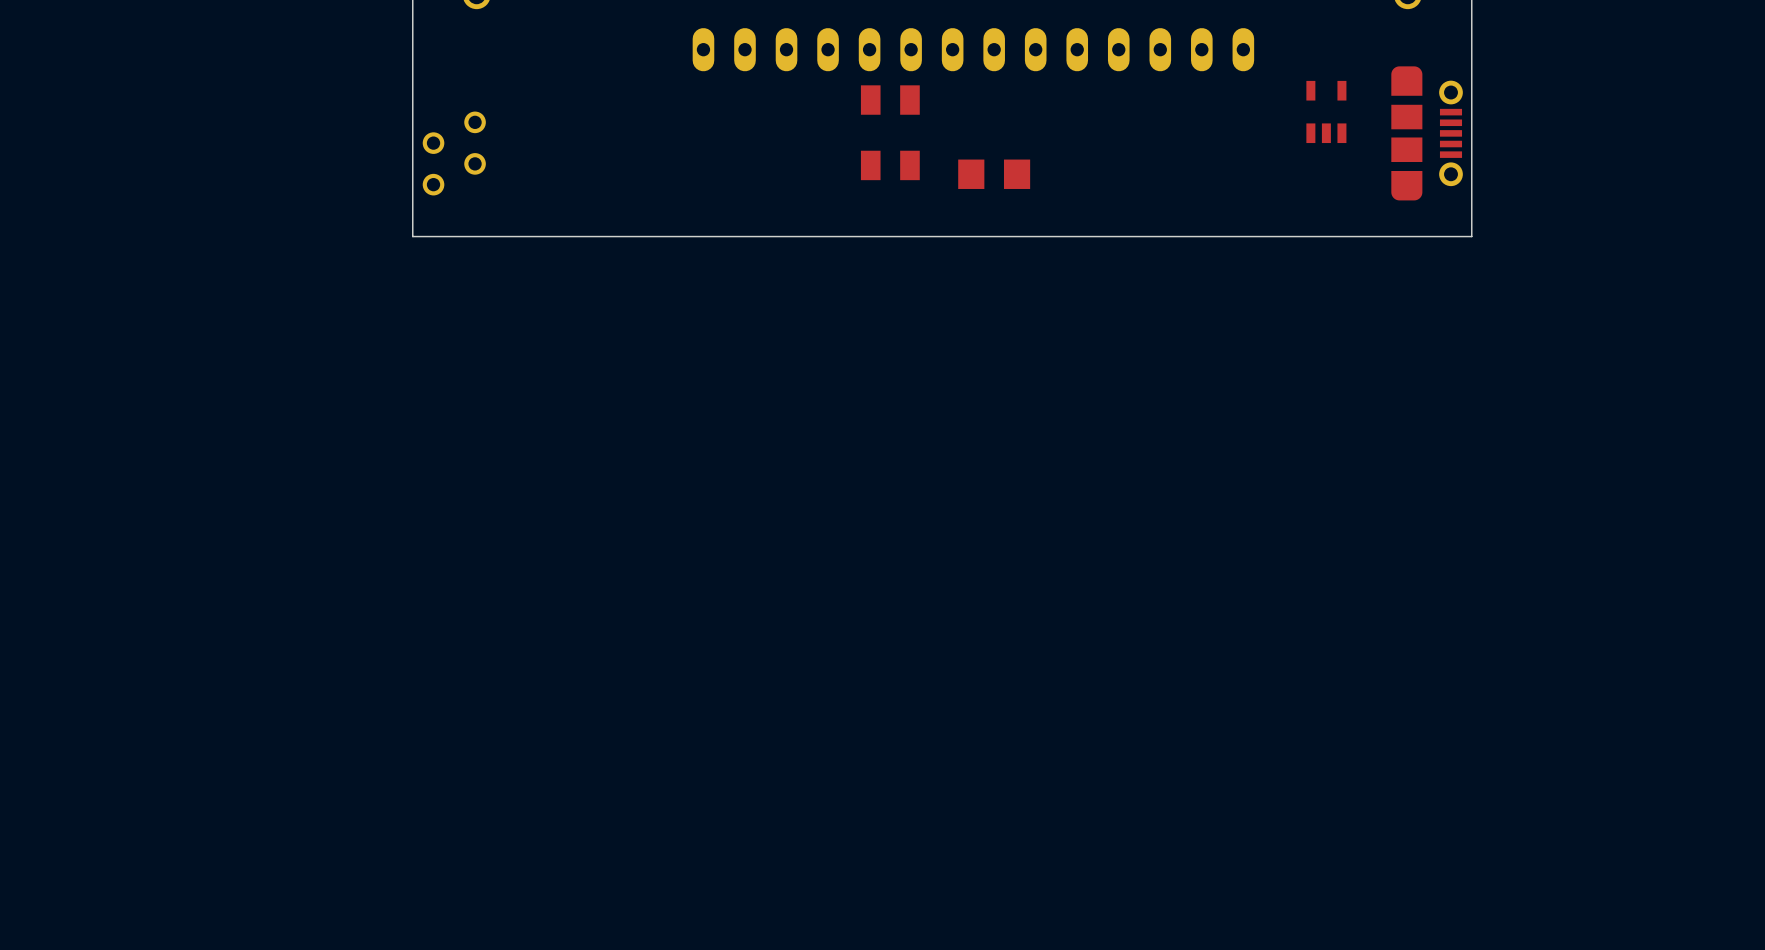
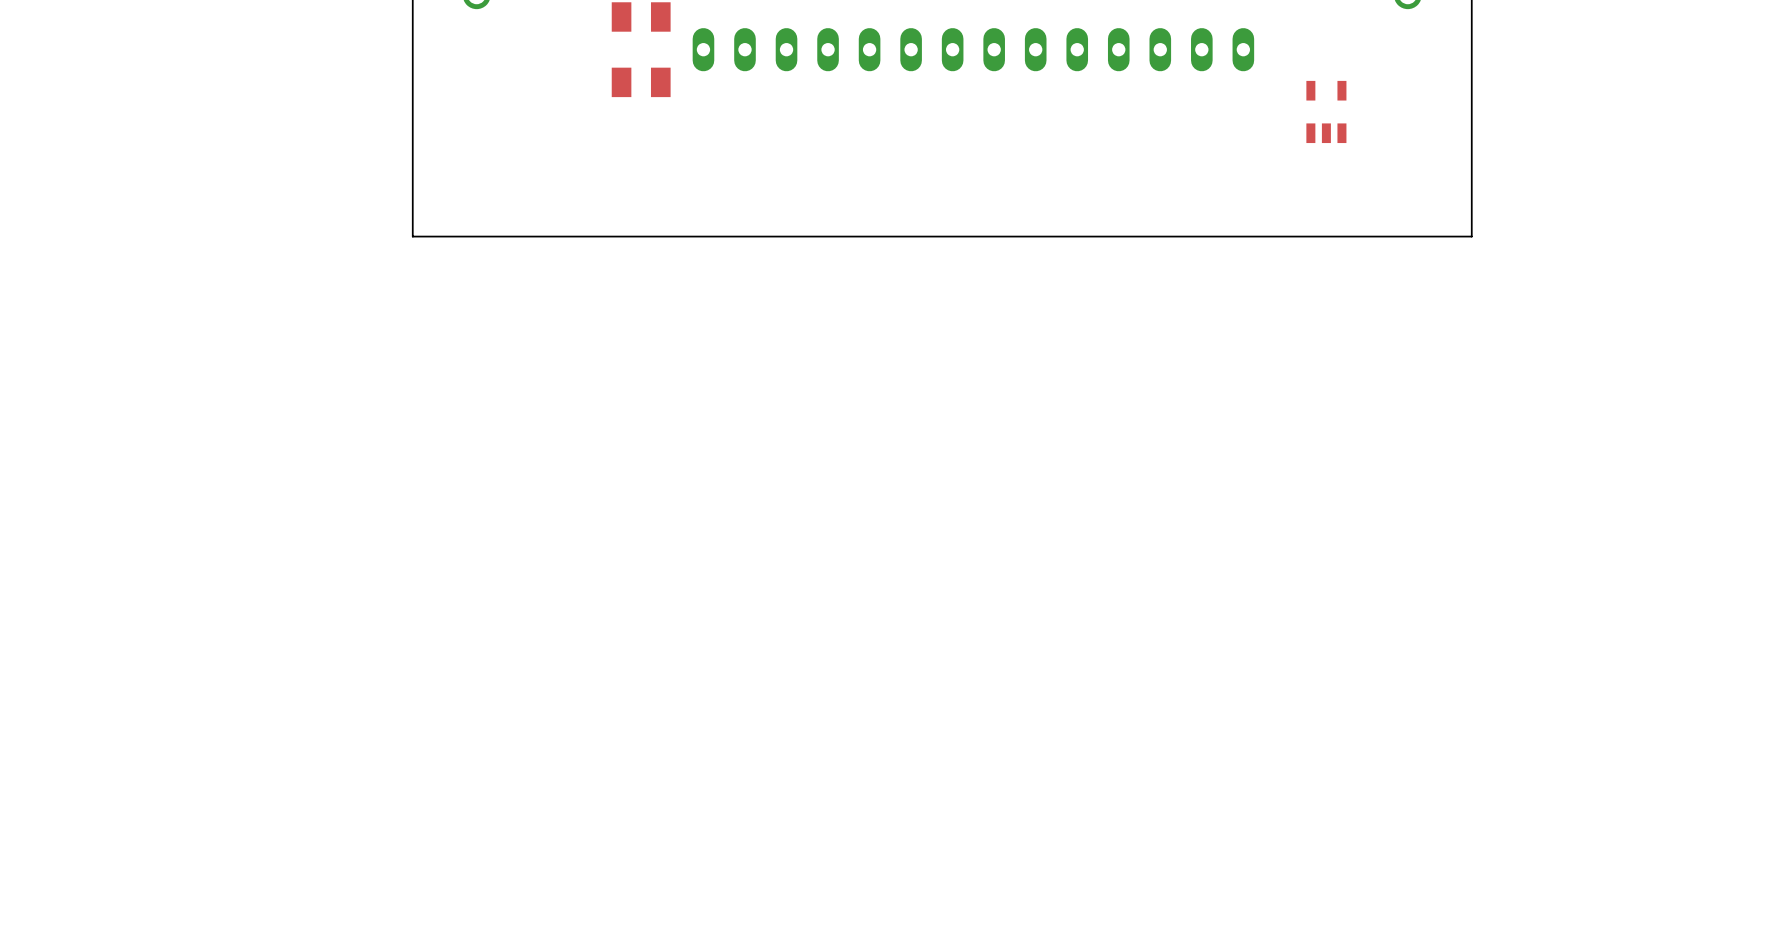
part position: (890, 132) -> (641, 49)
part: (1427, 133) -> none
part: (454, 153) -> none
part: (994, 174) -> none

